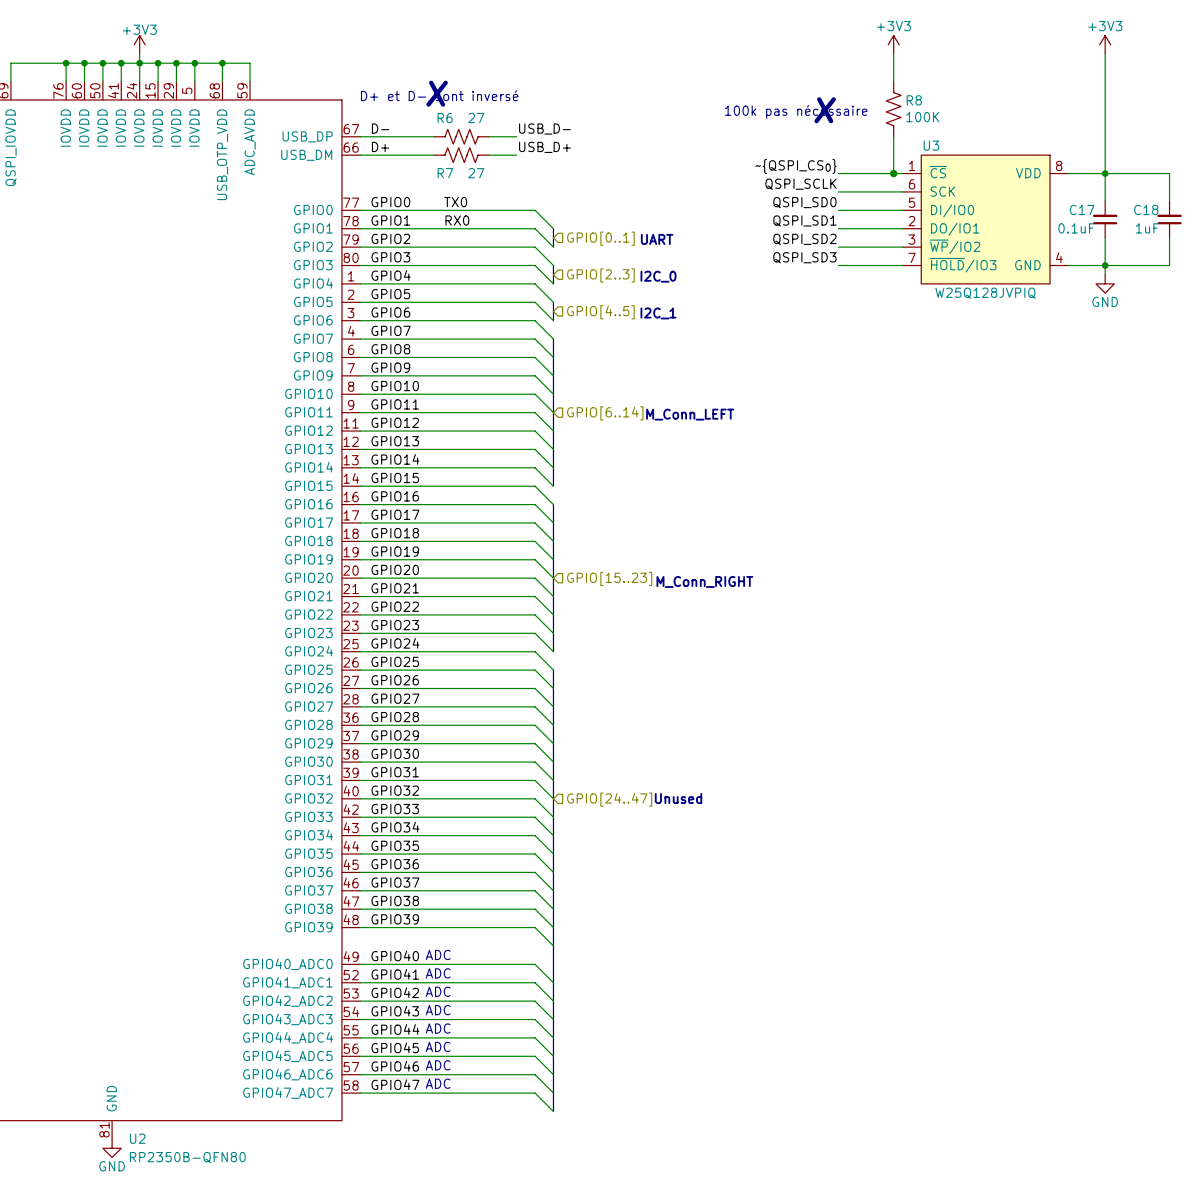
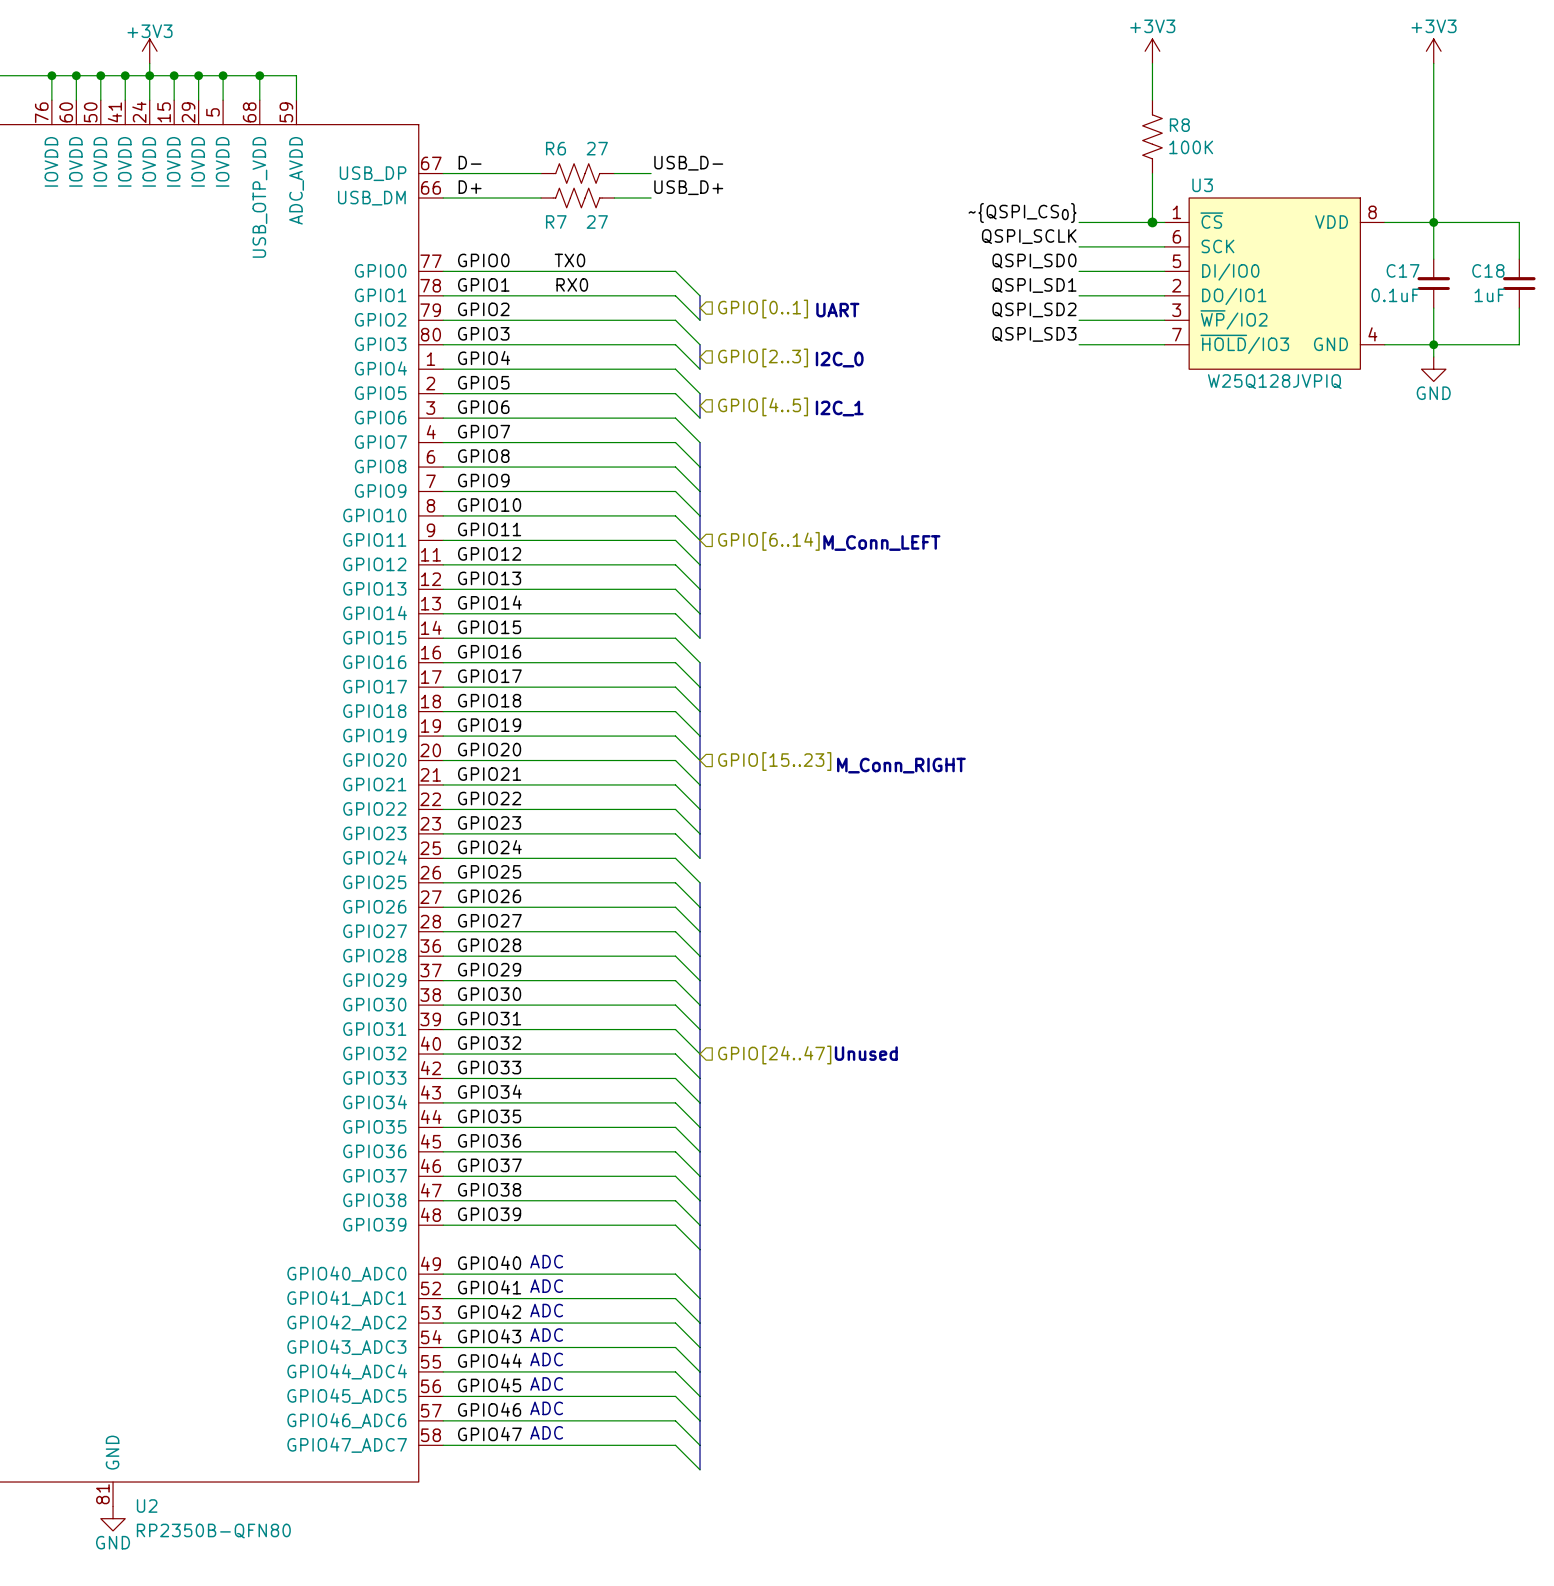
text: X (437, 93) -> none
text: D+ et D- sont inversé (439, 95) -> none
text: X (825, 110) -> none
text: 100k pas nécessaire (796, 112) -> none

